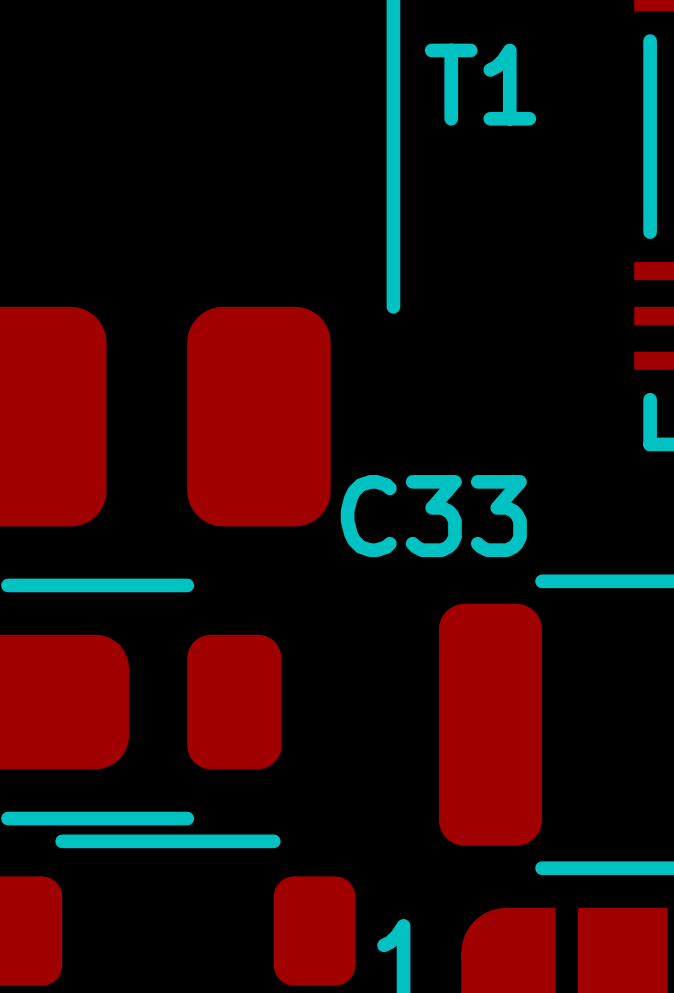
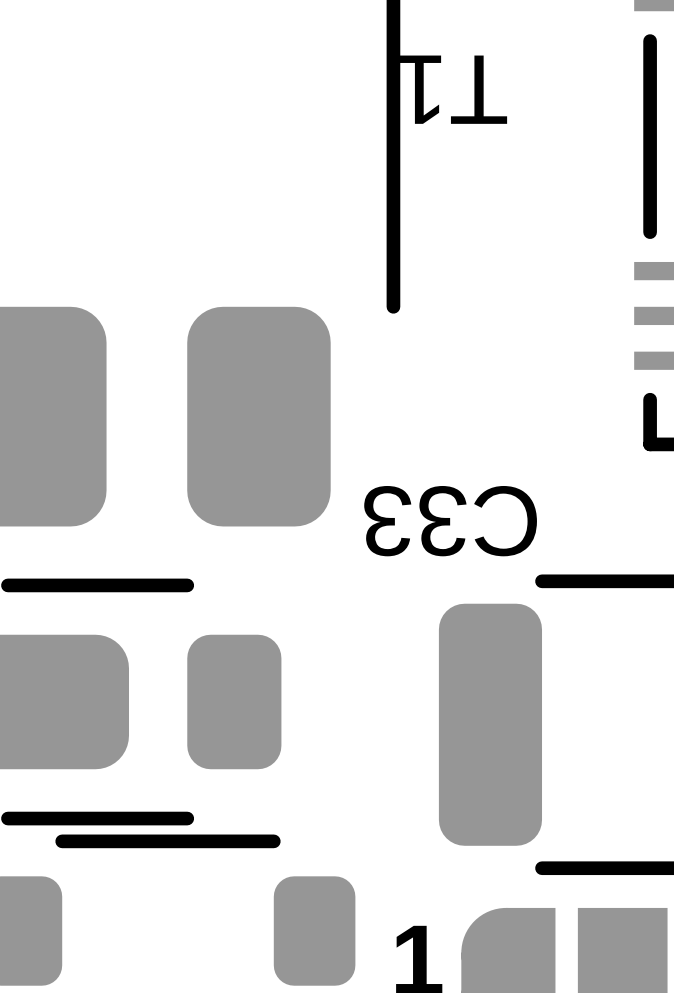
T1 name rotation: 0° (480, 84) -> 180° (452, 89)
C33 name rotation: 0° (433, 516) -> 180° (450, 521)

